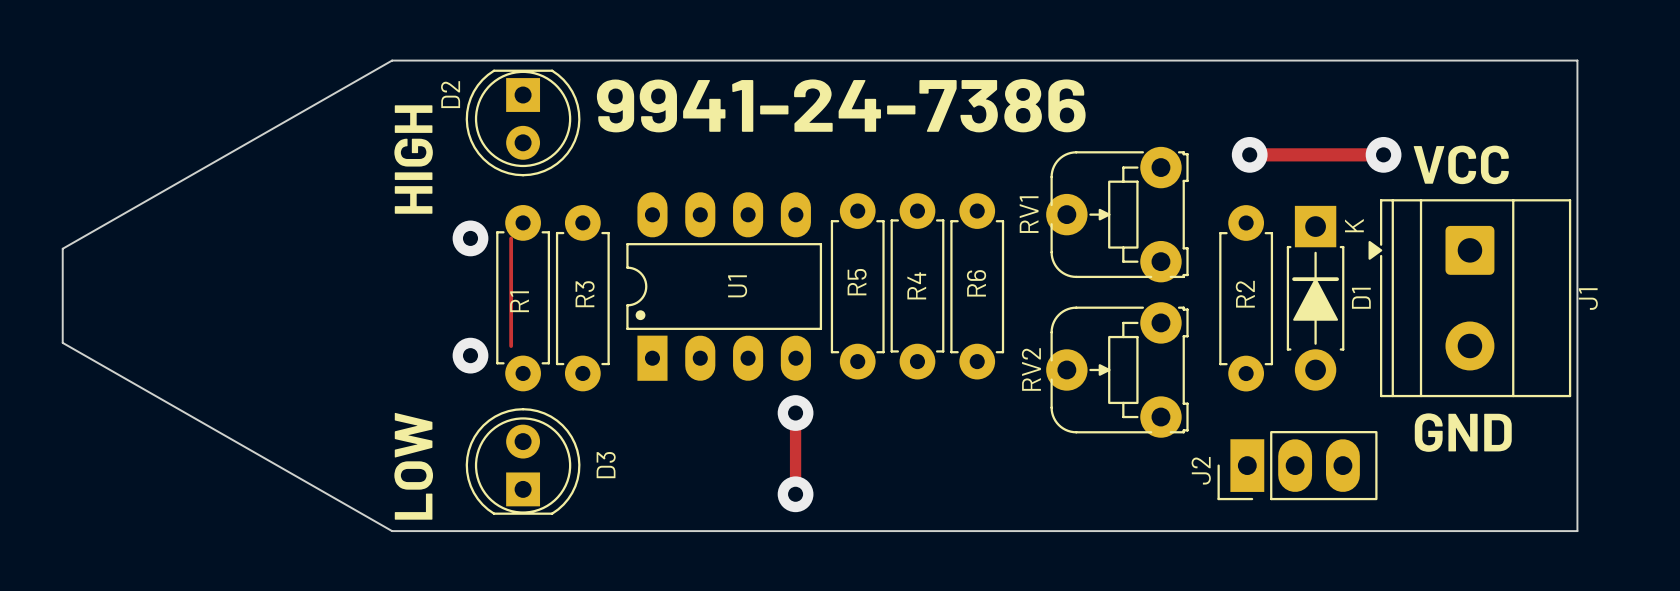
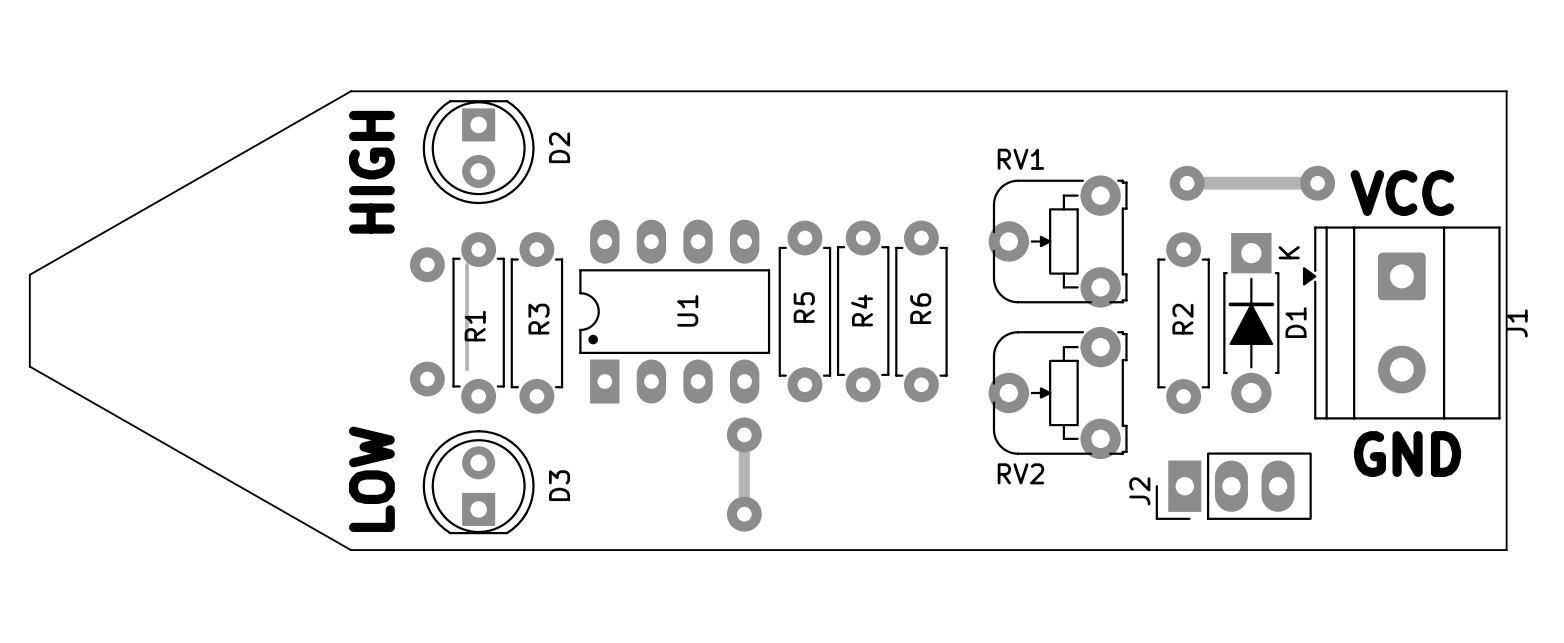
D2 name position: D2 (450, 94) -> D2 (559, 147)
text: 9941-24-7386 (841, 105) -> none
RV1 name rotation: 0° (1029, 214) -> 90° clockwise (1020, 159)
RV1 name position: RV1 (1029, 214) -> RV1 (1020, 159)
RV2 name rotation: 0° (1031, 369) -> 90° clockwise (1020, 473)
RV2 name position: RV2 (1031, 369) -> RV2 (1020, 473)

